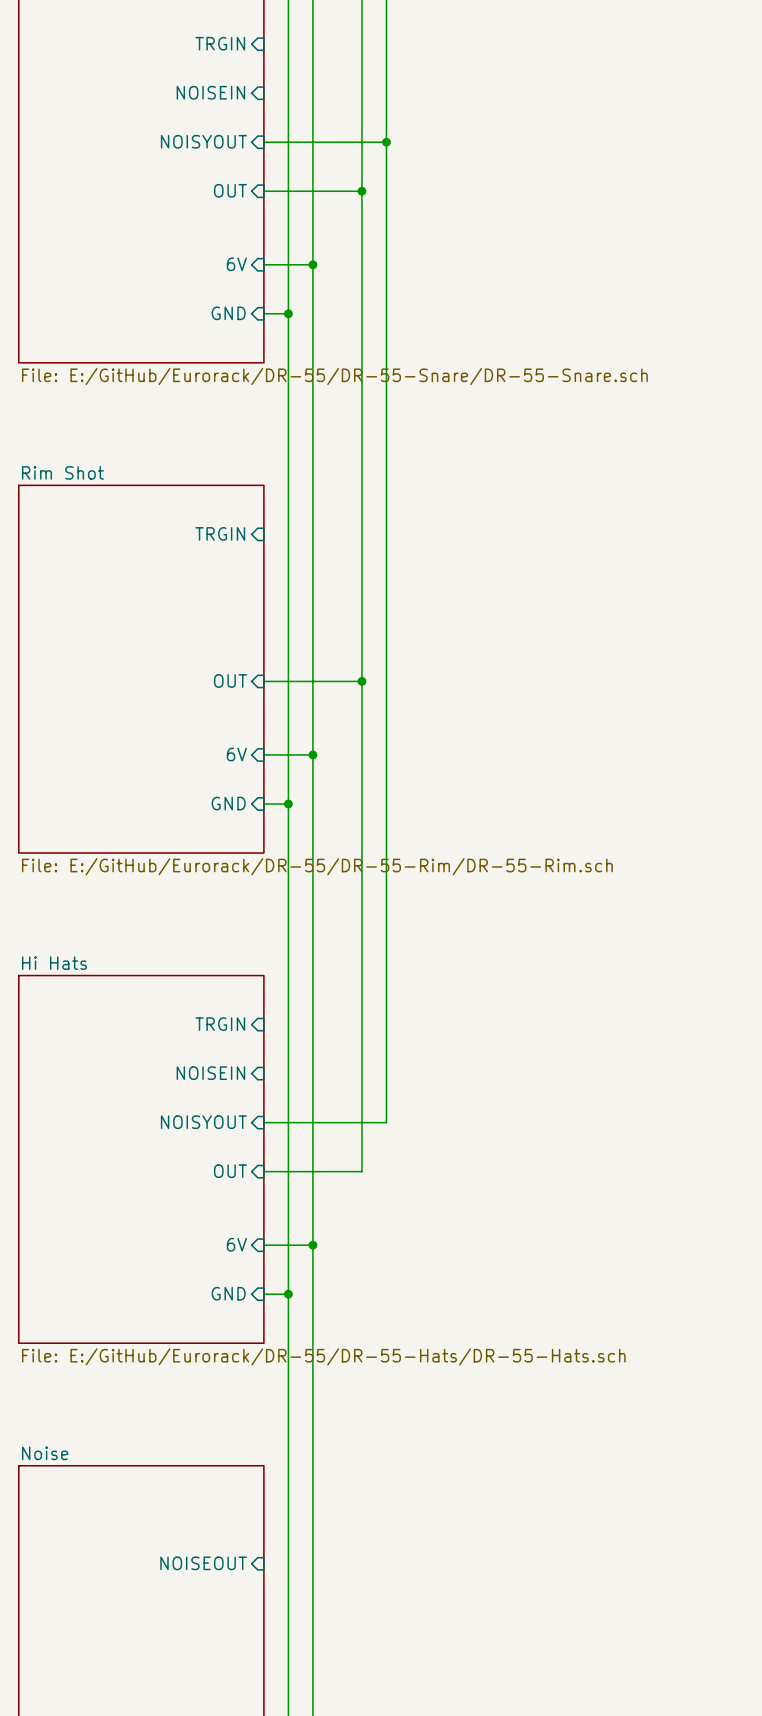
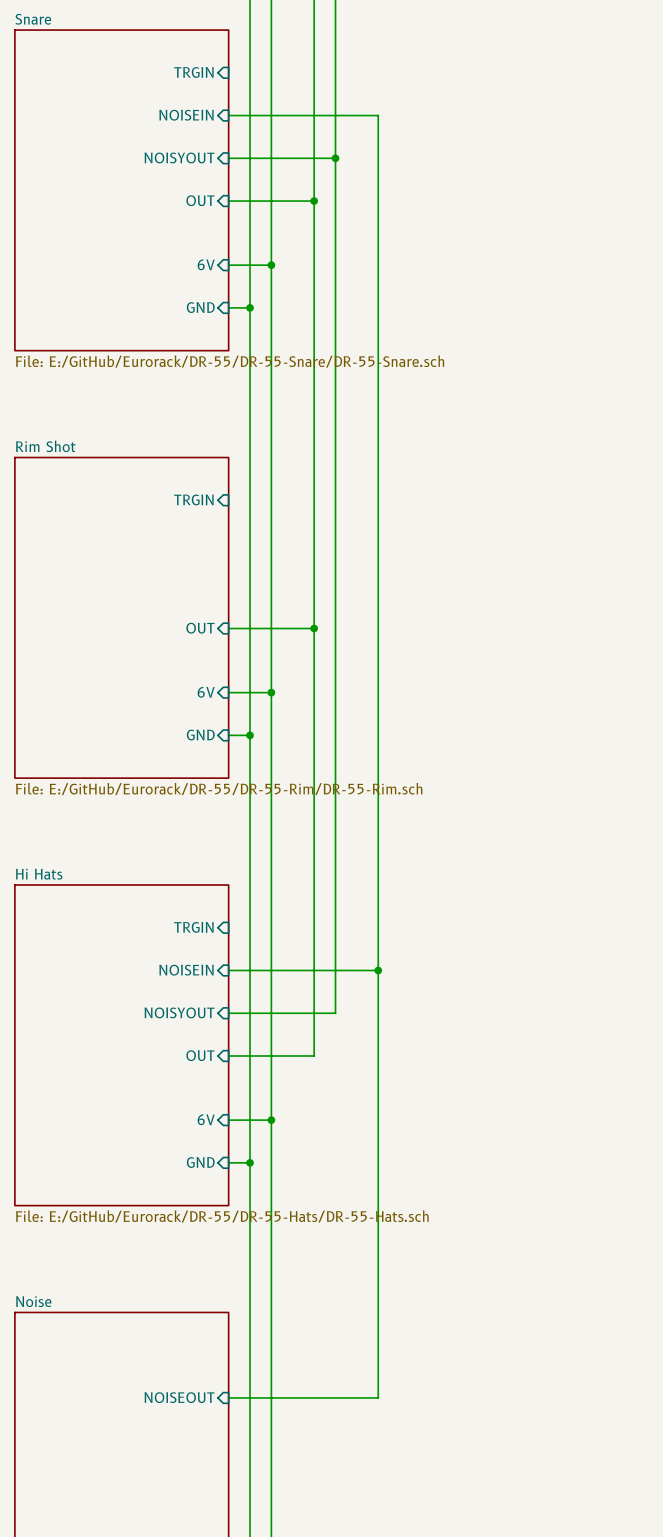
wire: none -> (228, 115) (378, 115) (378, 1397) (228, 1397)
wire: none -> (228, 970) (378, 970)
junction: none -> (378, 970)

